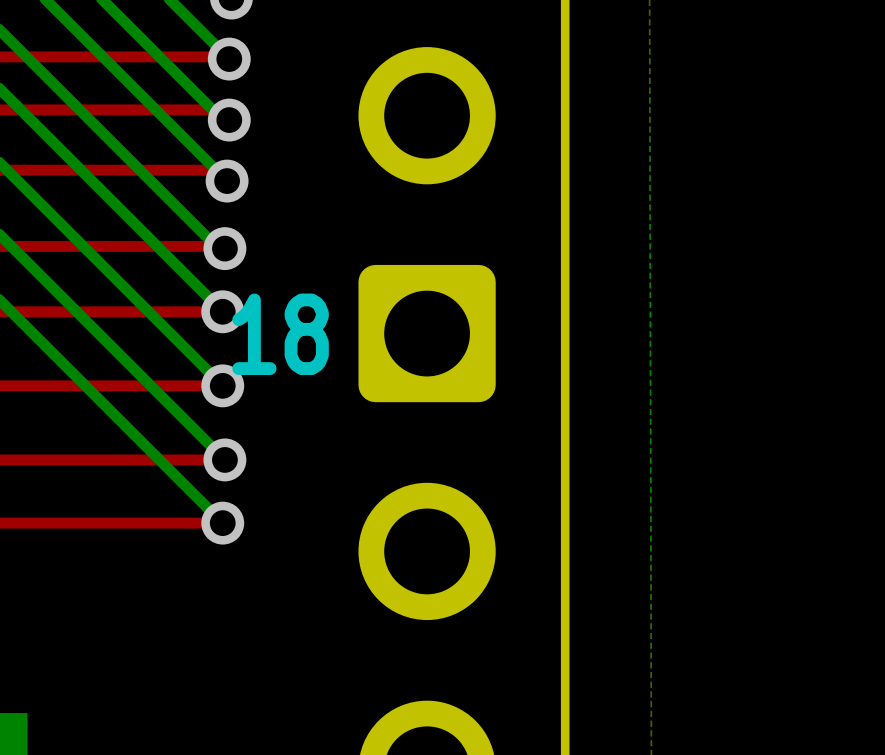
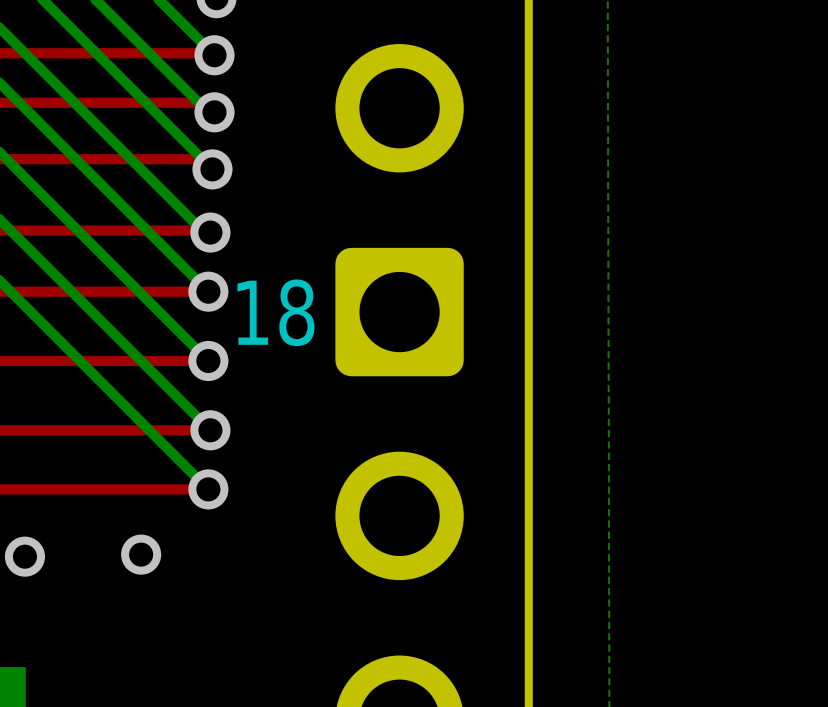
via: none -> (141, 554)
via: none -> (24, 556)

